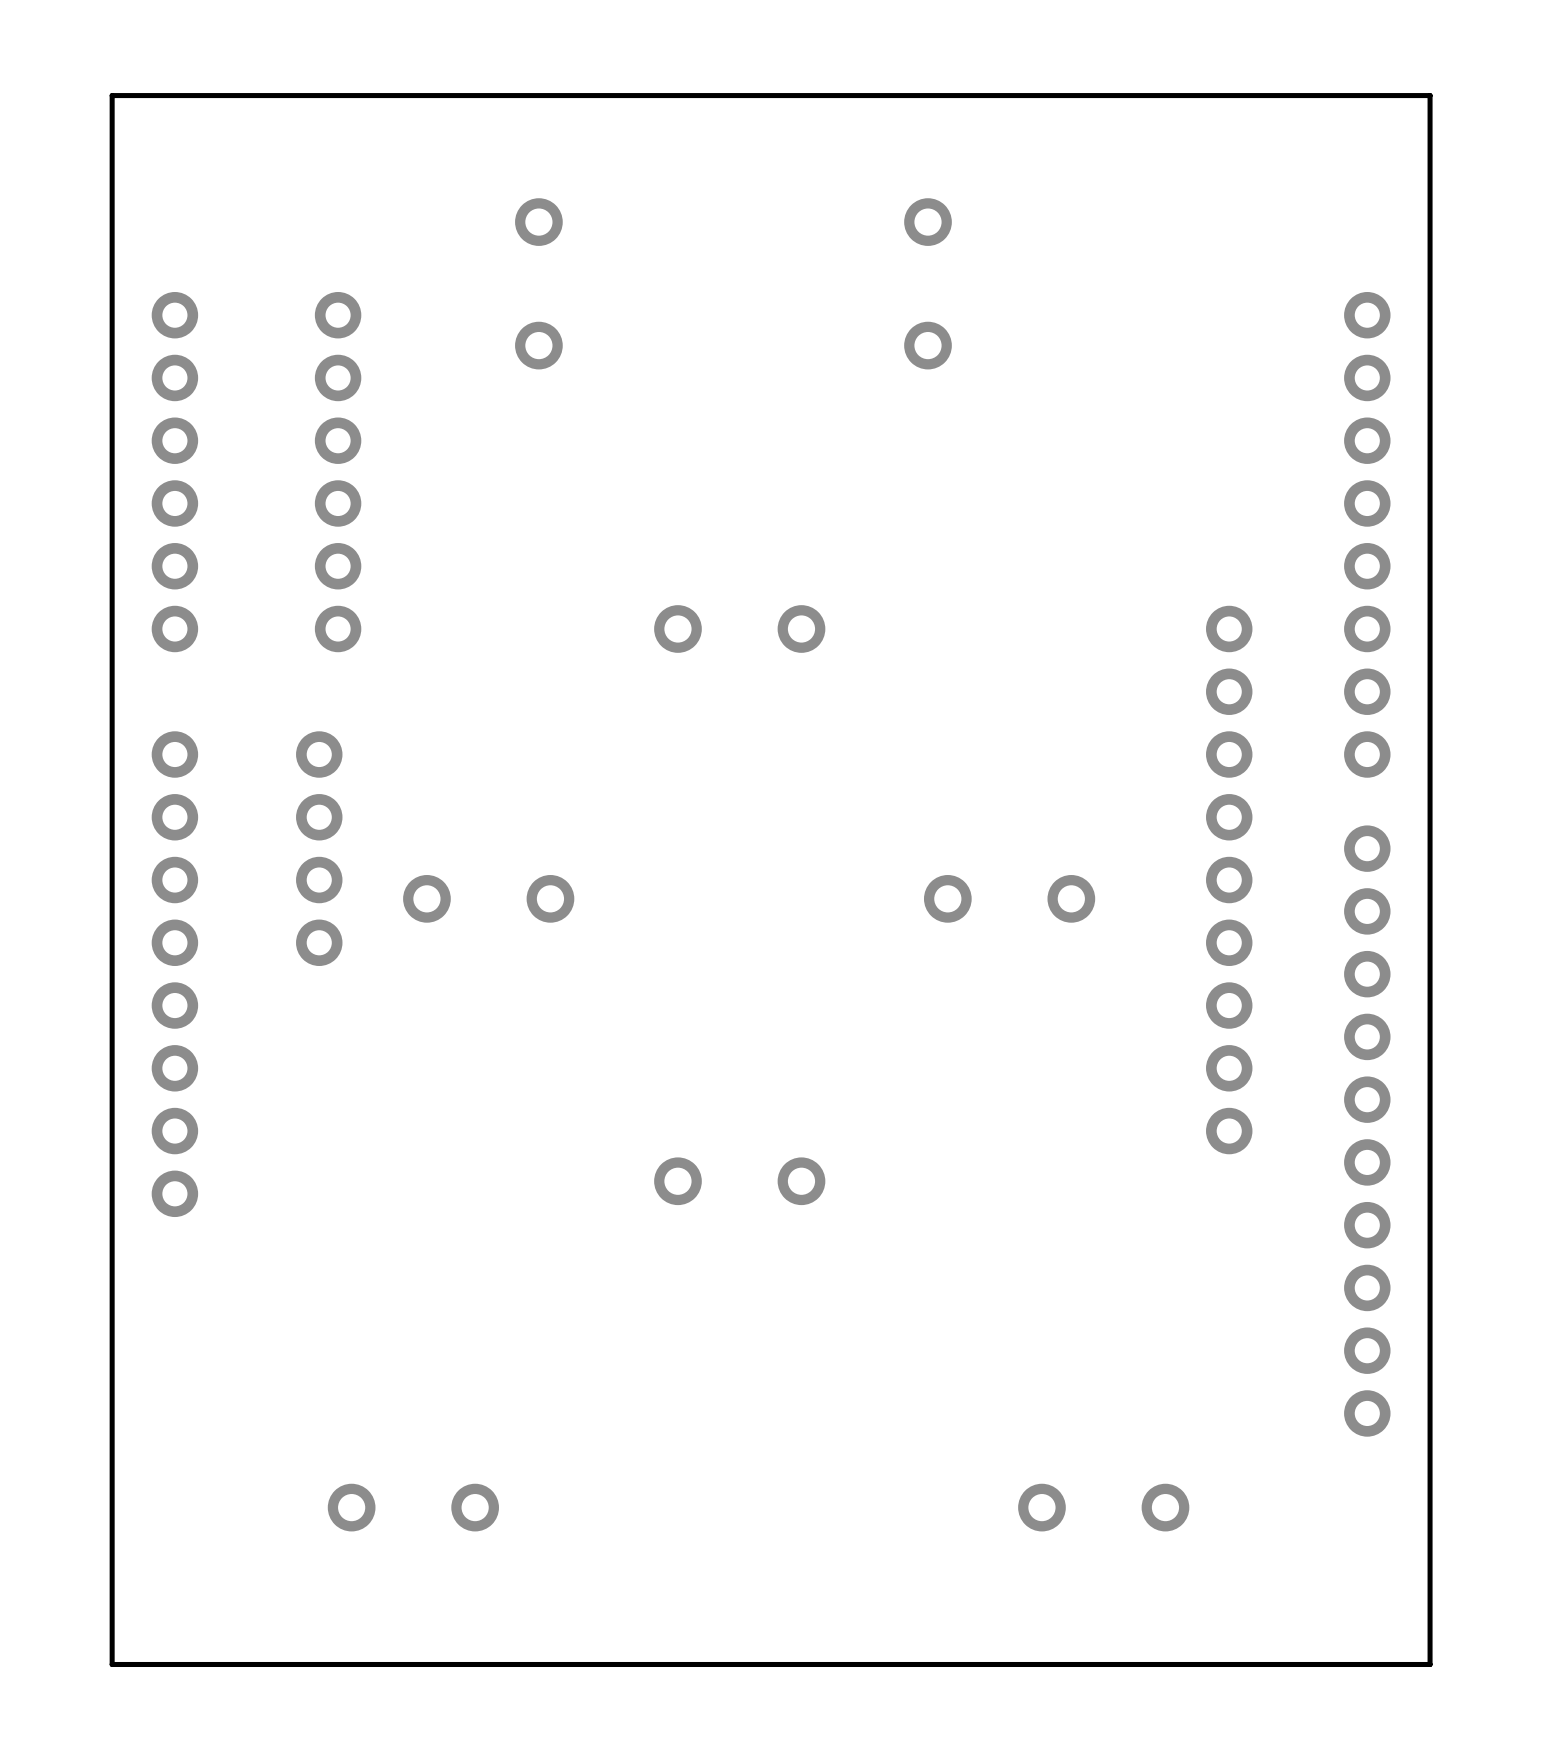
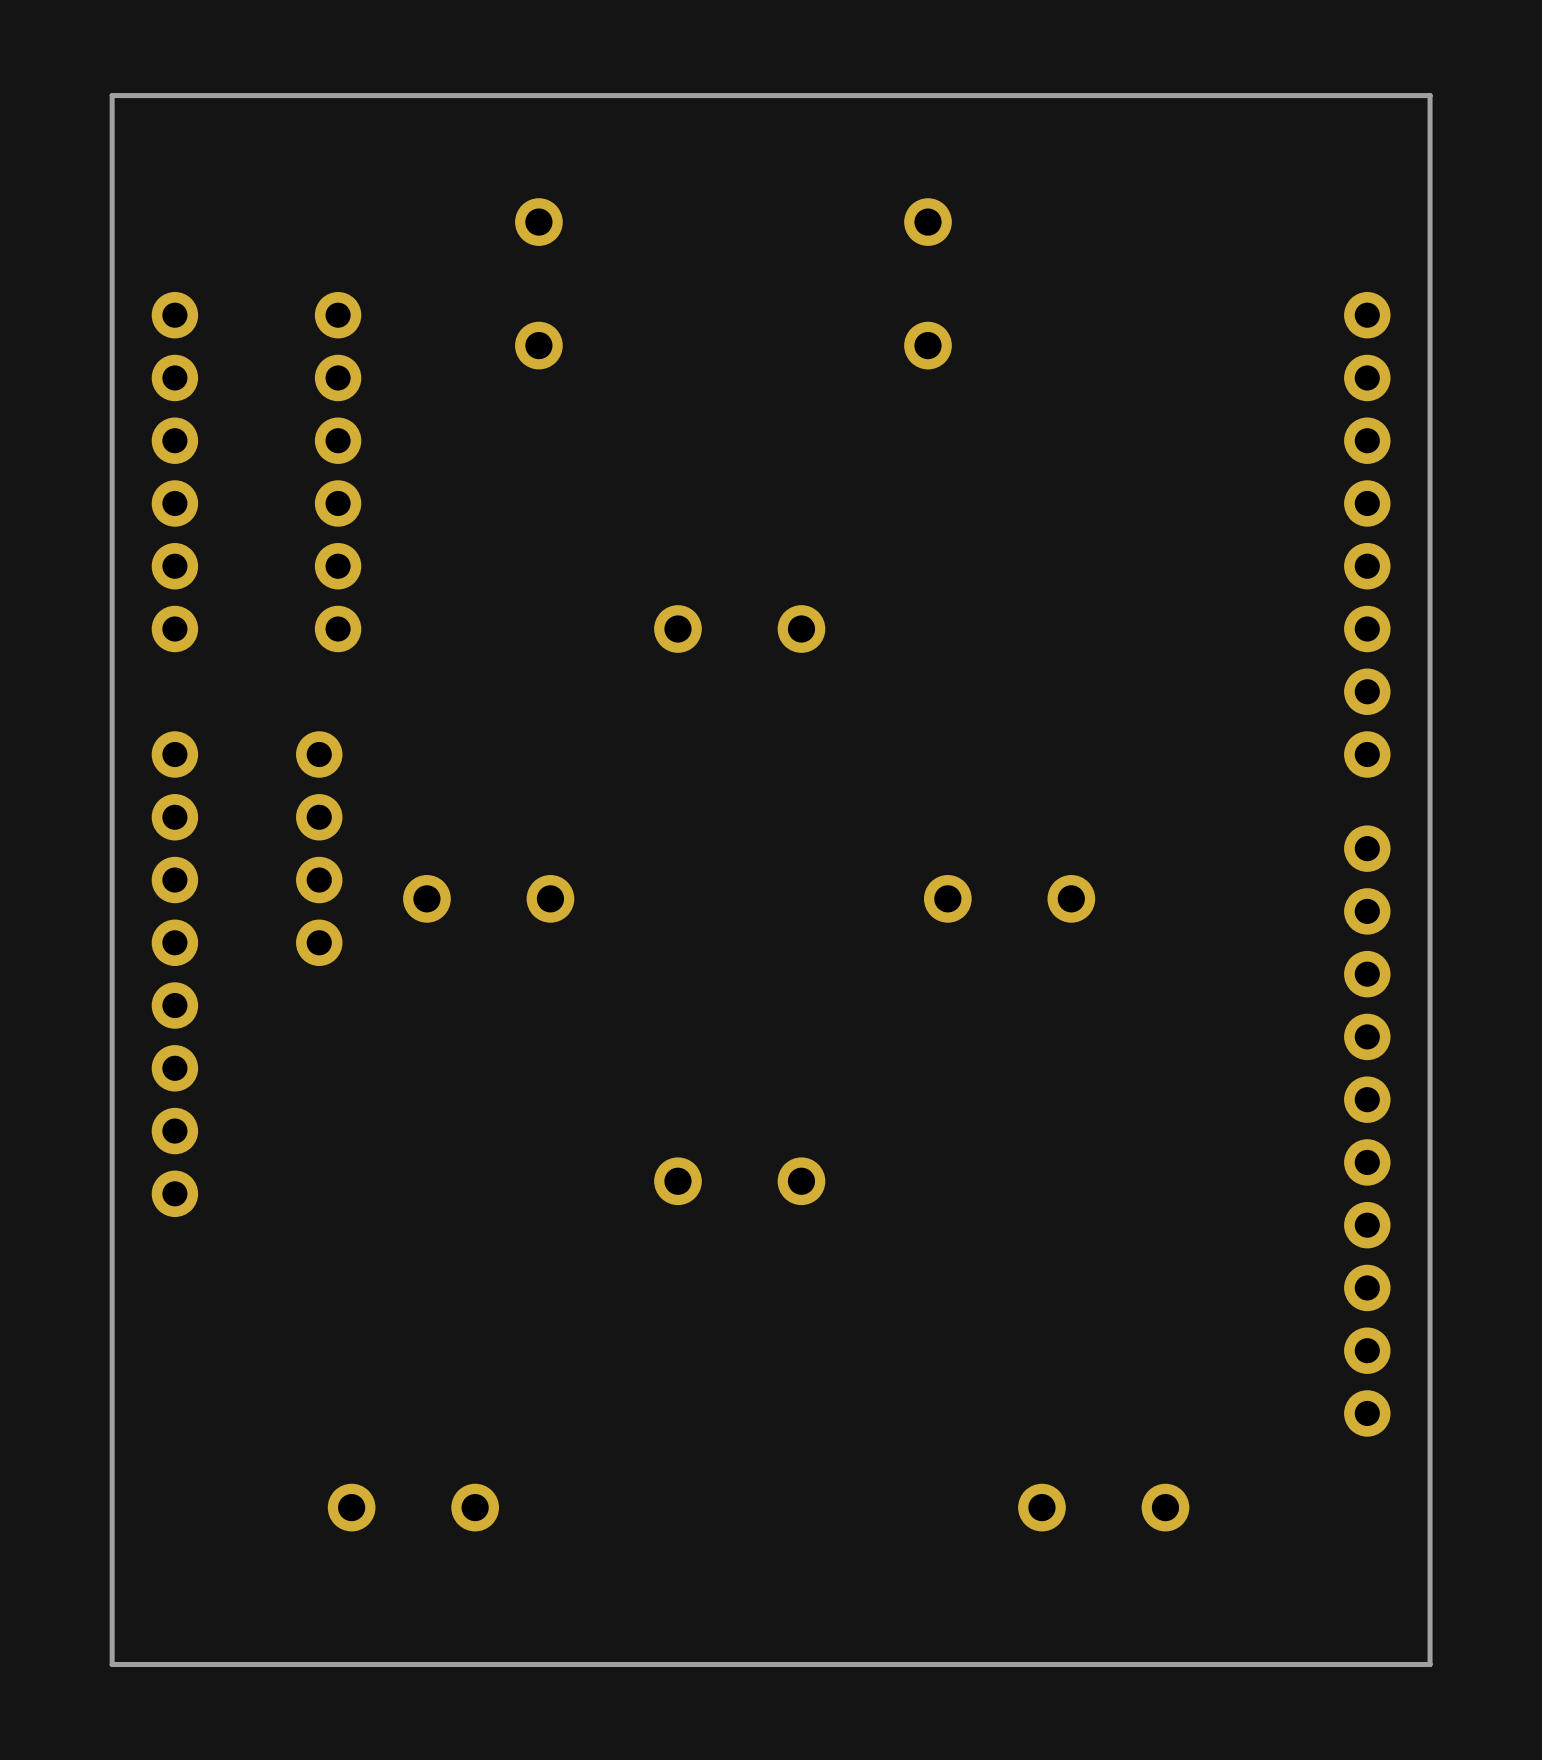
part: (1229, 880) -> none

